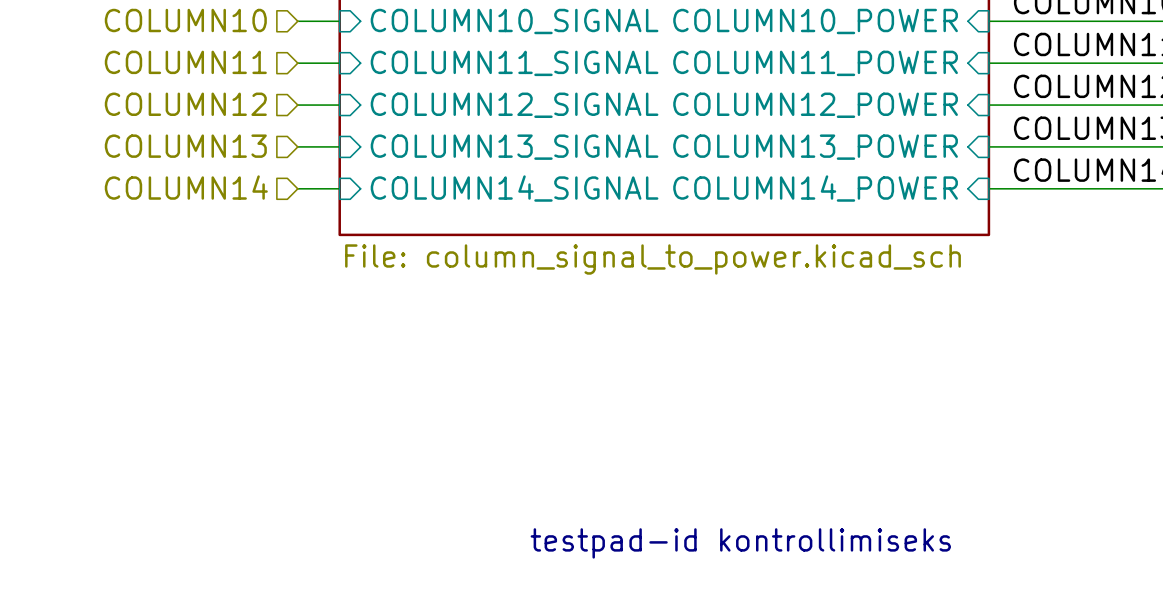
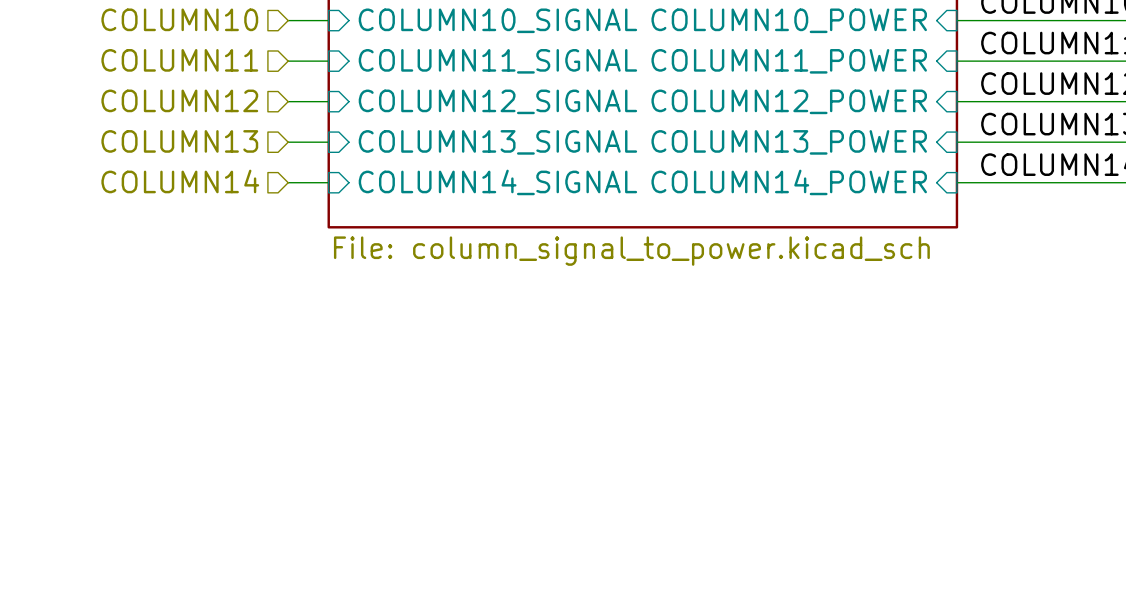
text: testpad-id kontrollimiseks (740, 543) -> none

